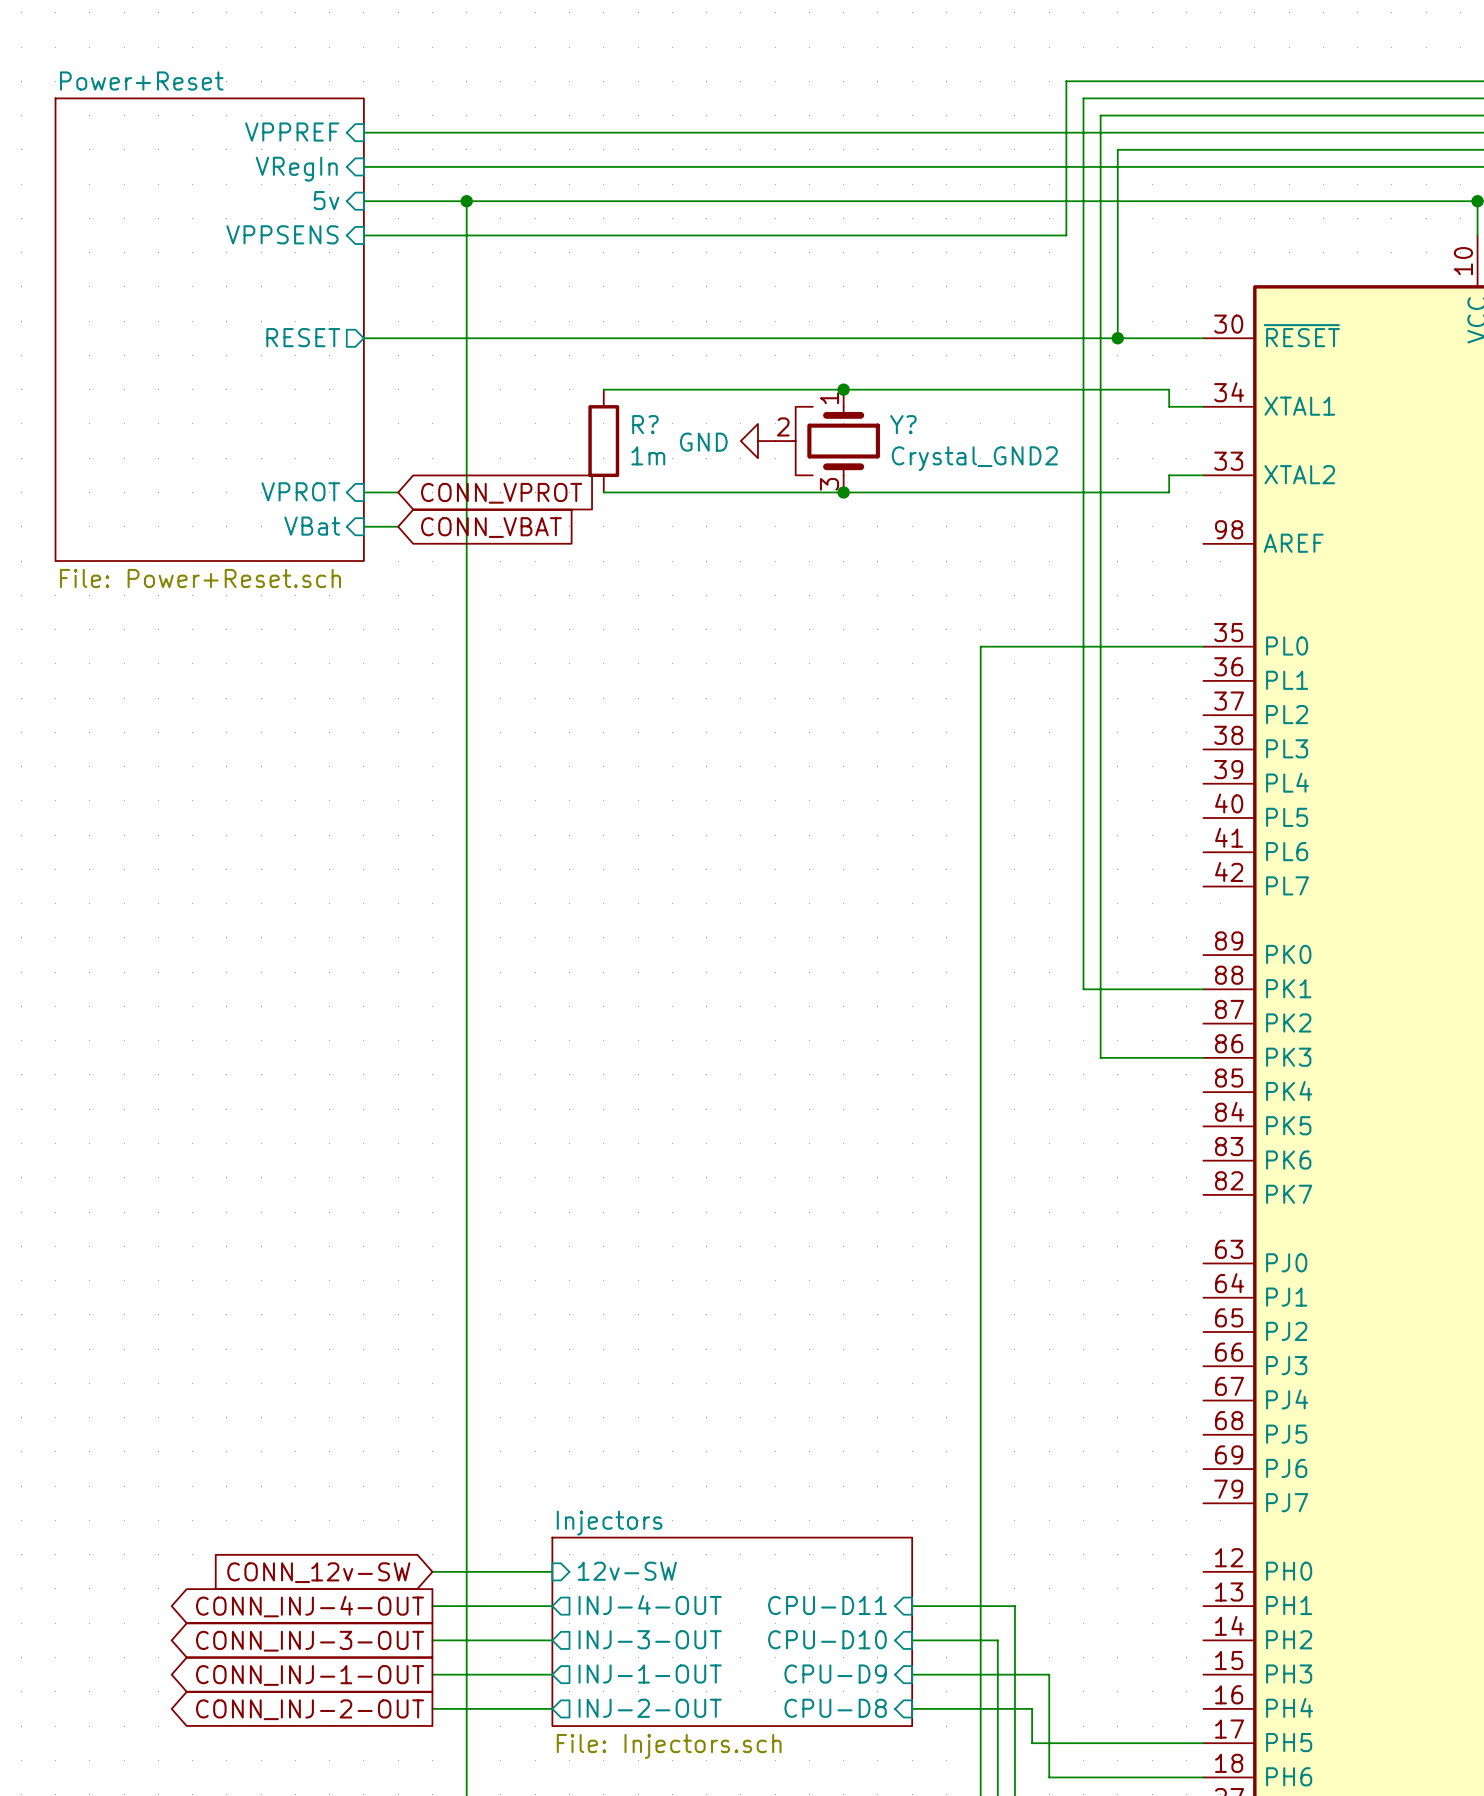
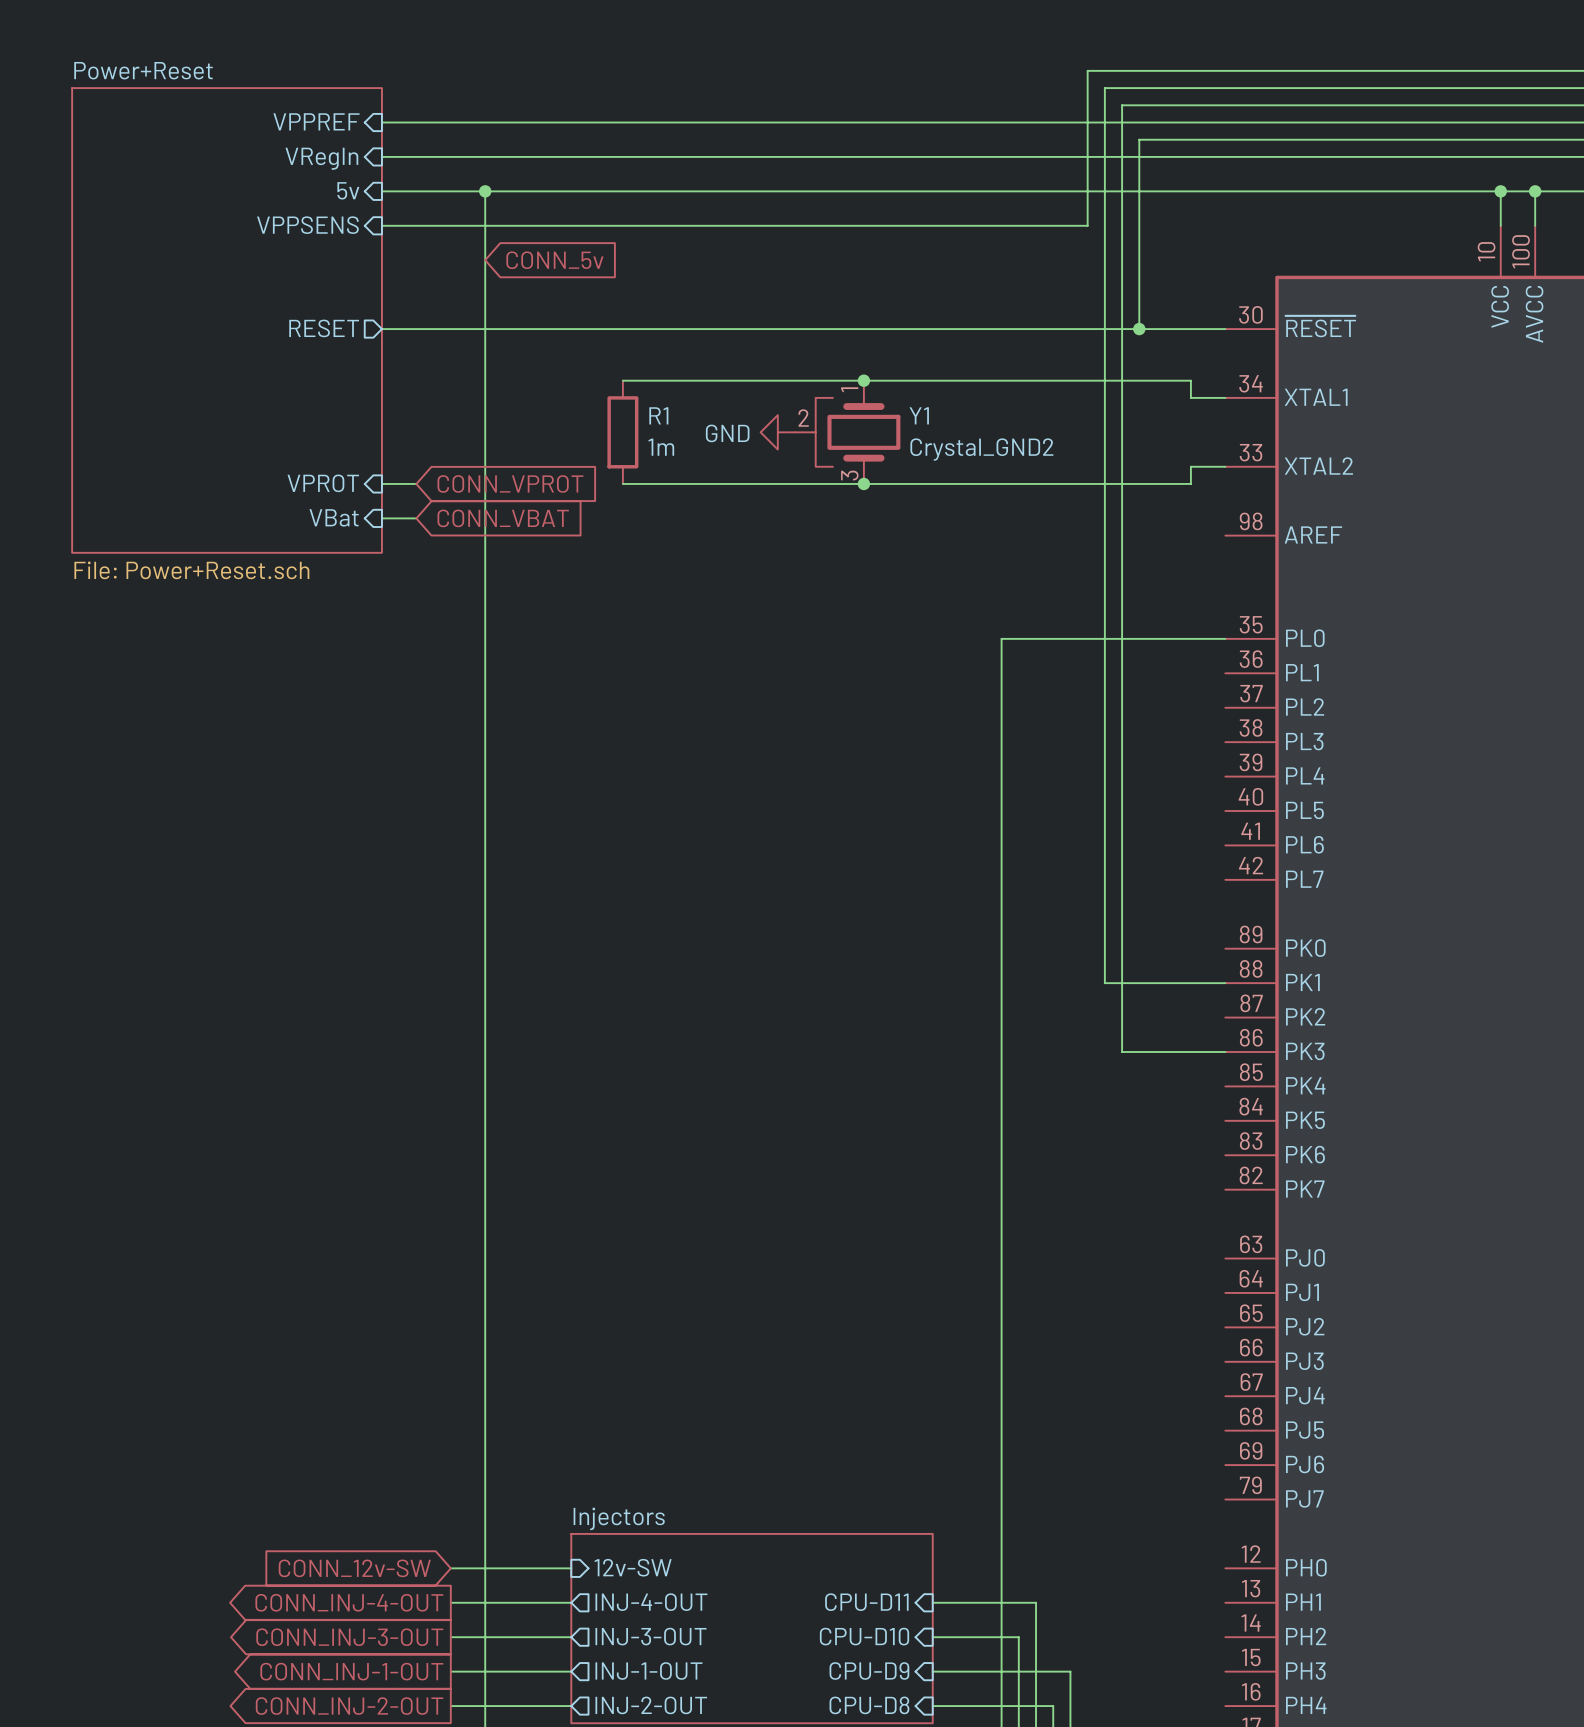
global label: none -> CONN_5v (554, 260)
R? name: R? (645, 424) -> R1 (658, 415)
Y? name: Y? (903, 424) -> Y1 (919, 415)

